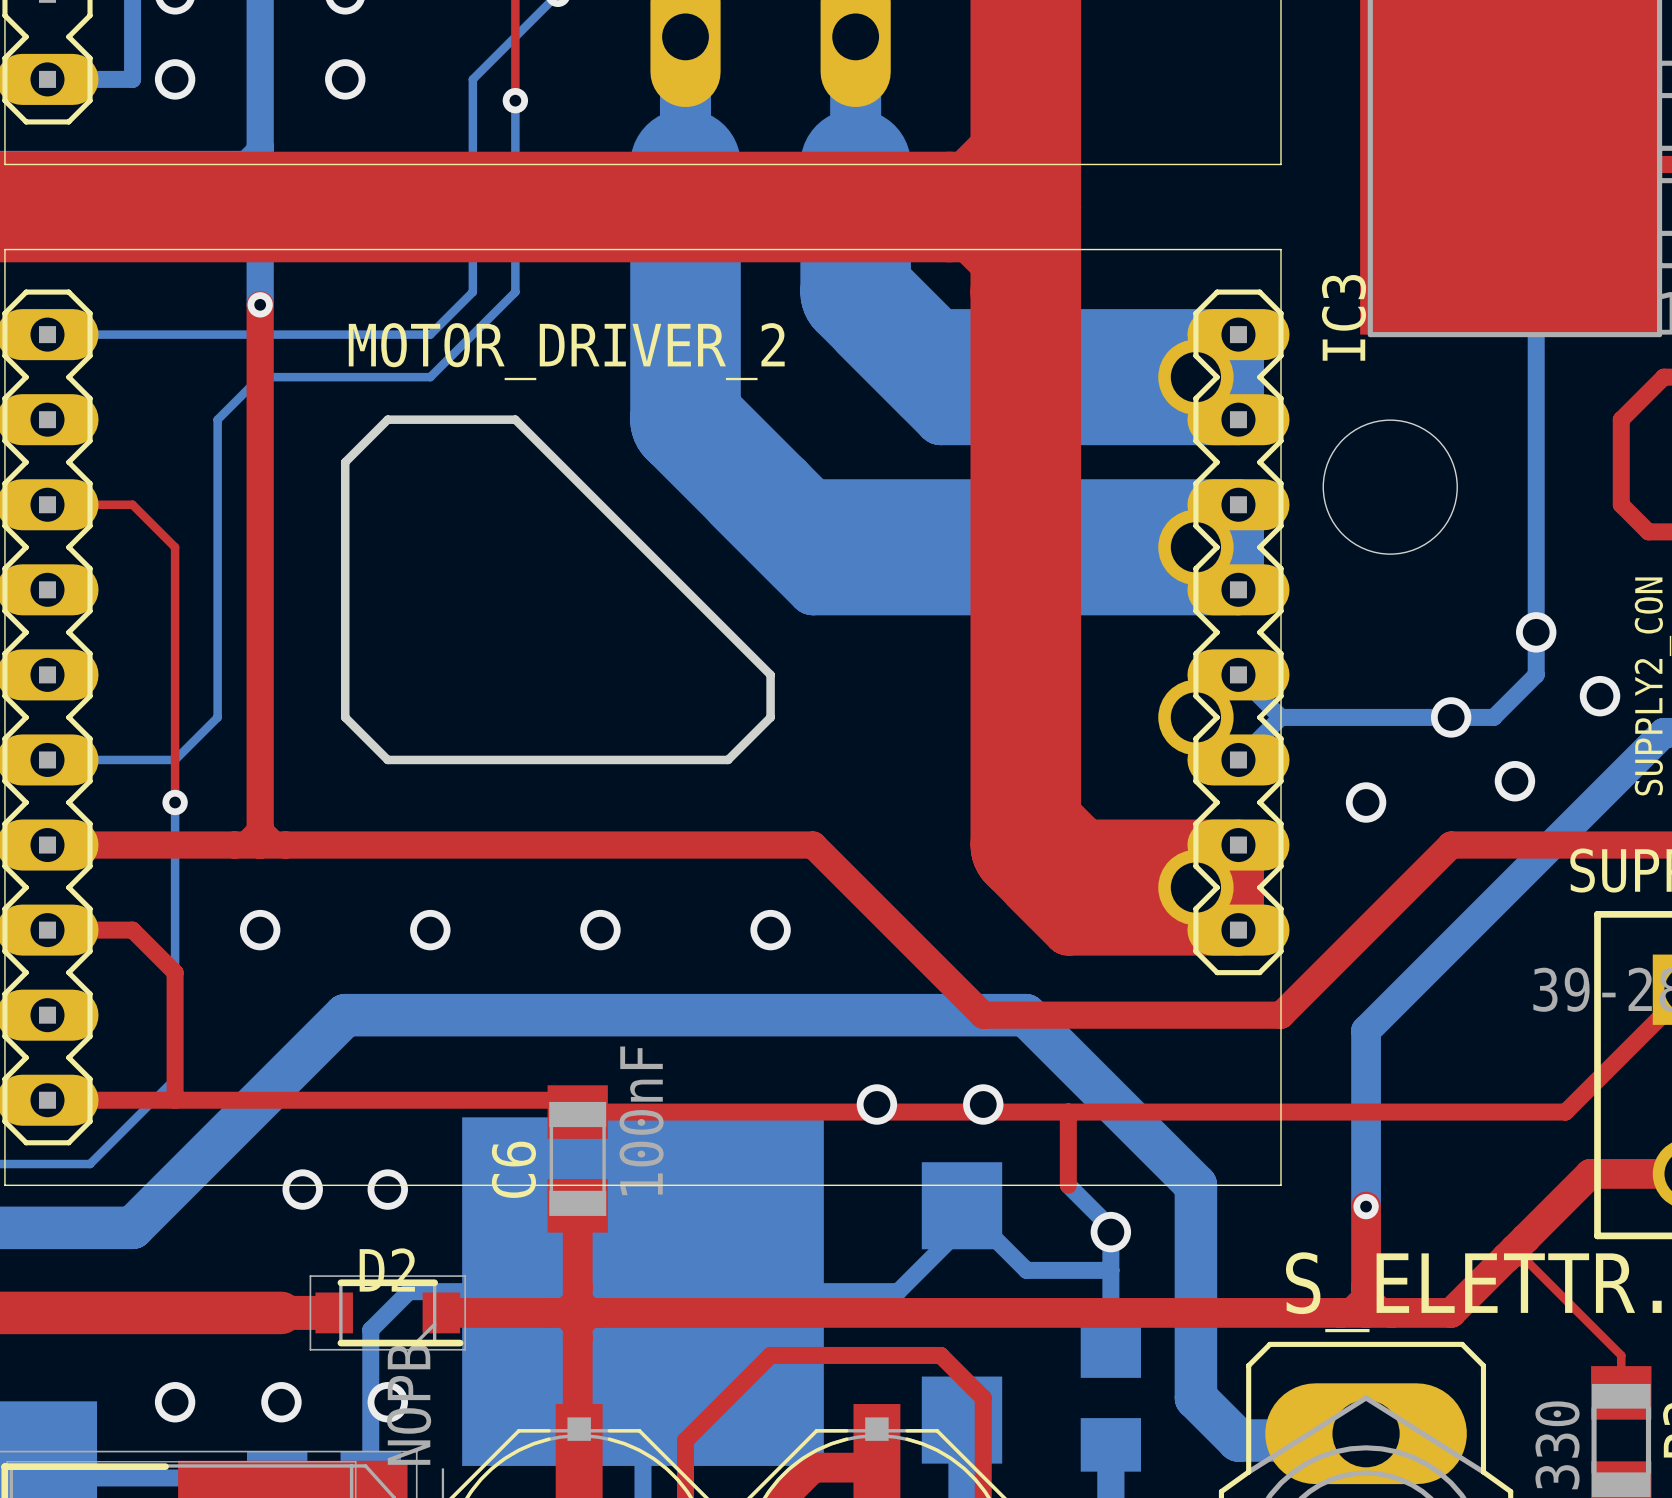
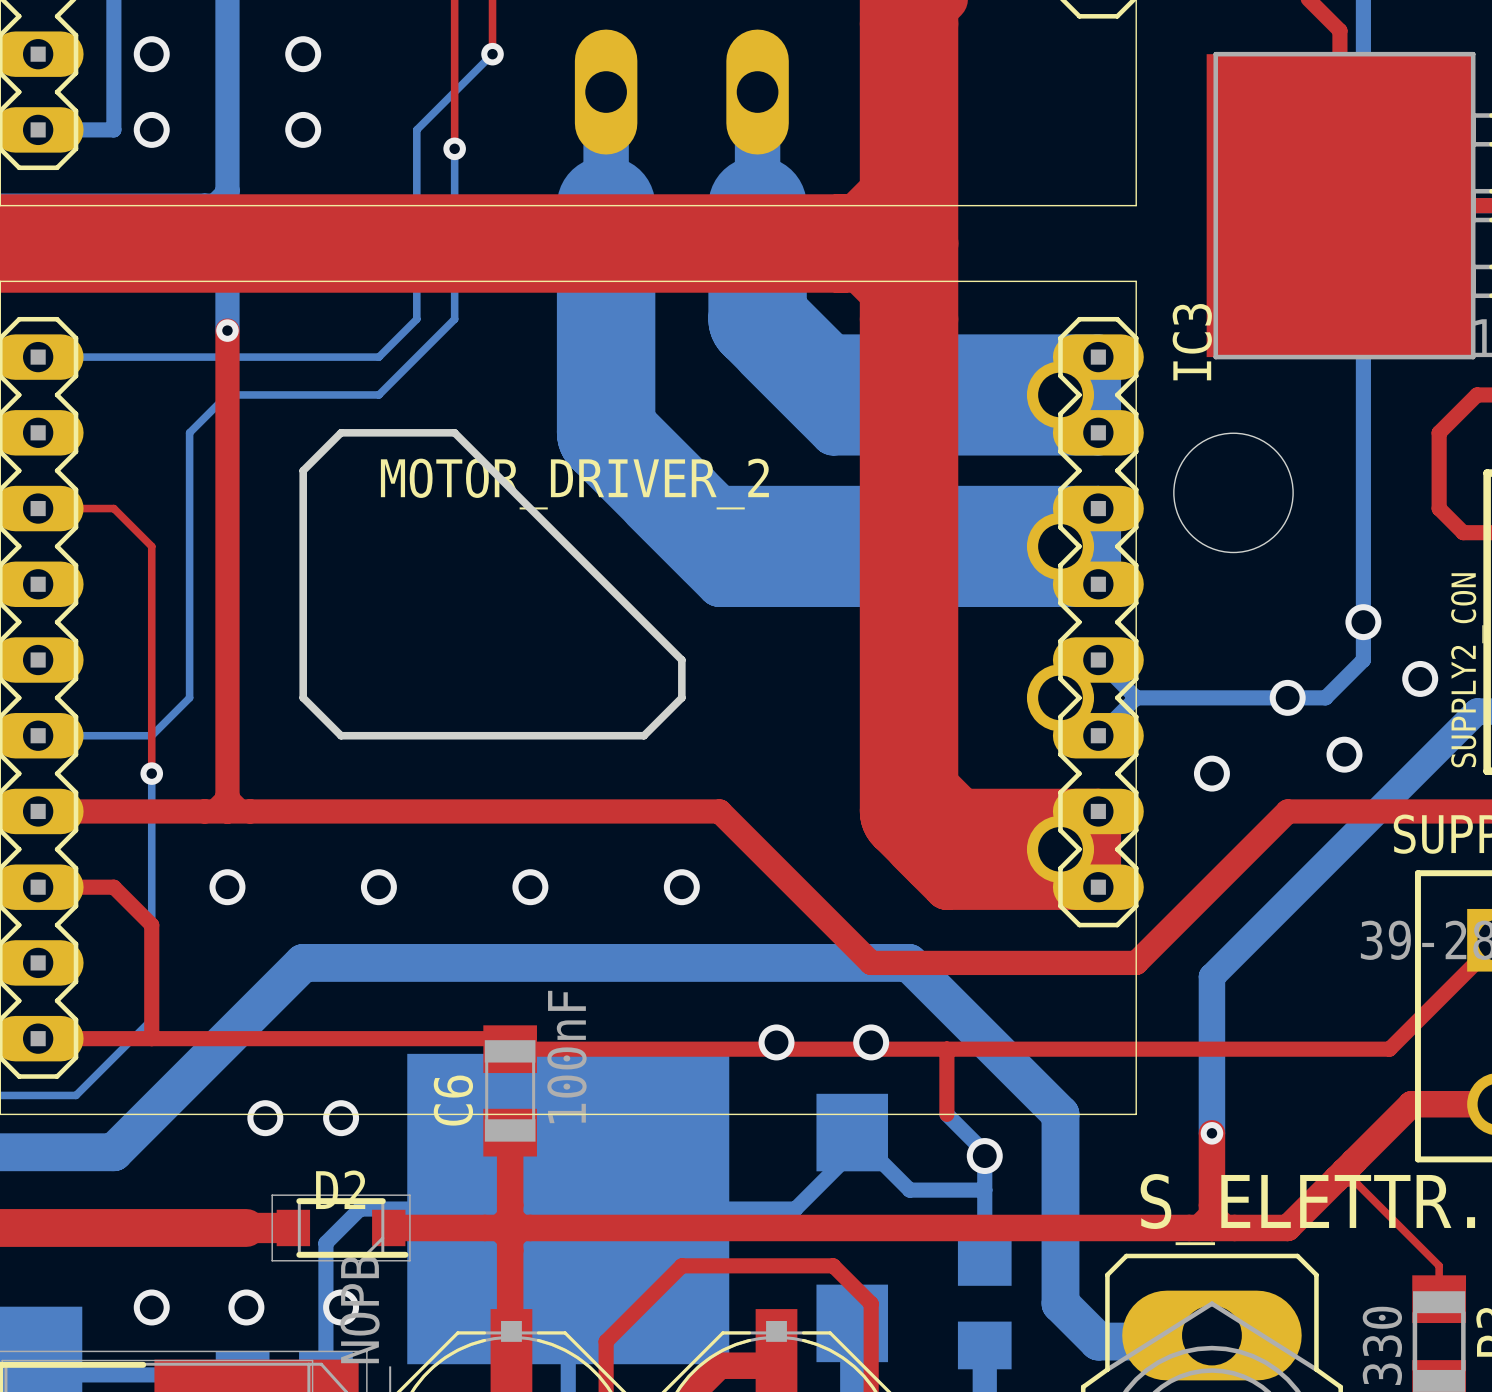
MOTOR_DRIVER_2 name position: MOTOR_DRIVER_2 (566, 351) -> MOTOR_DRIVER_2 (574, 484)

